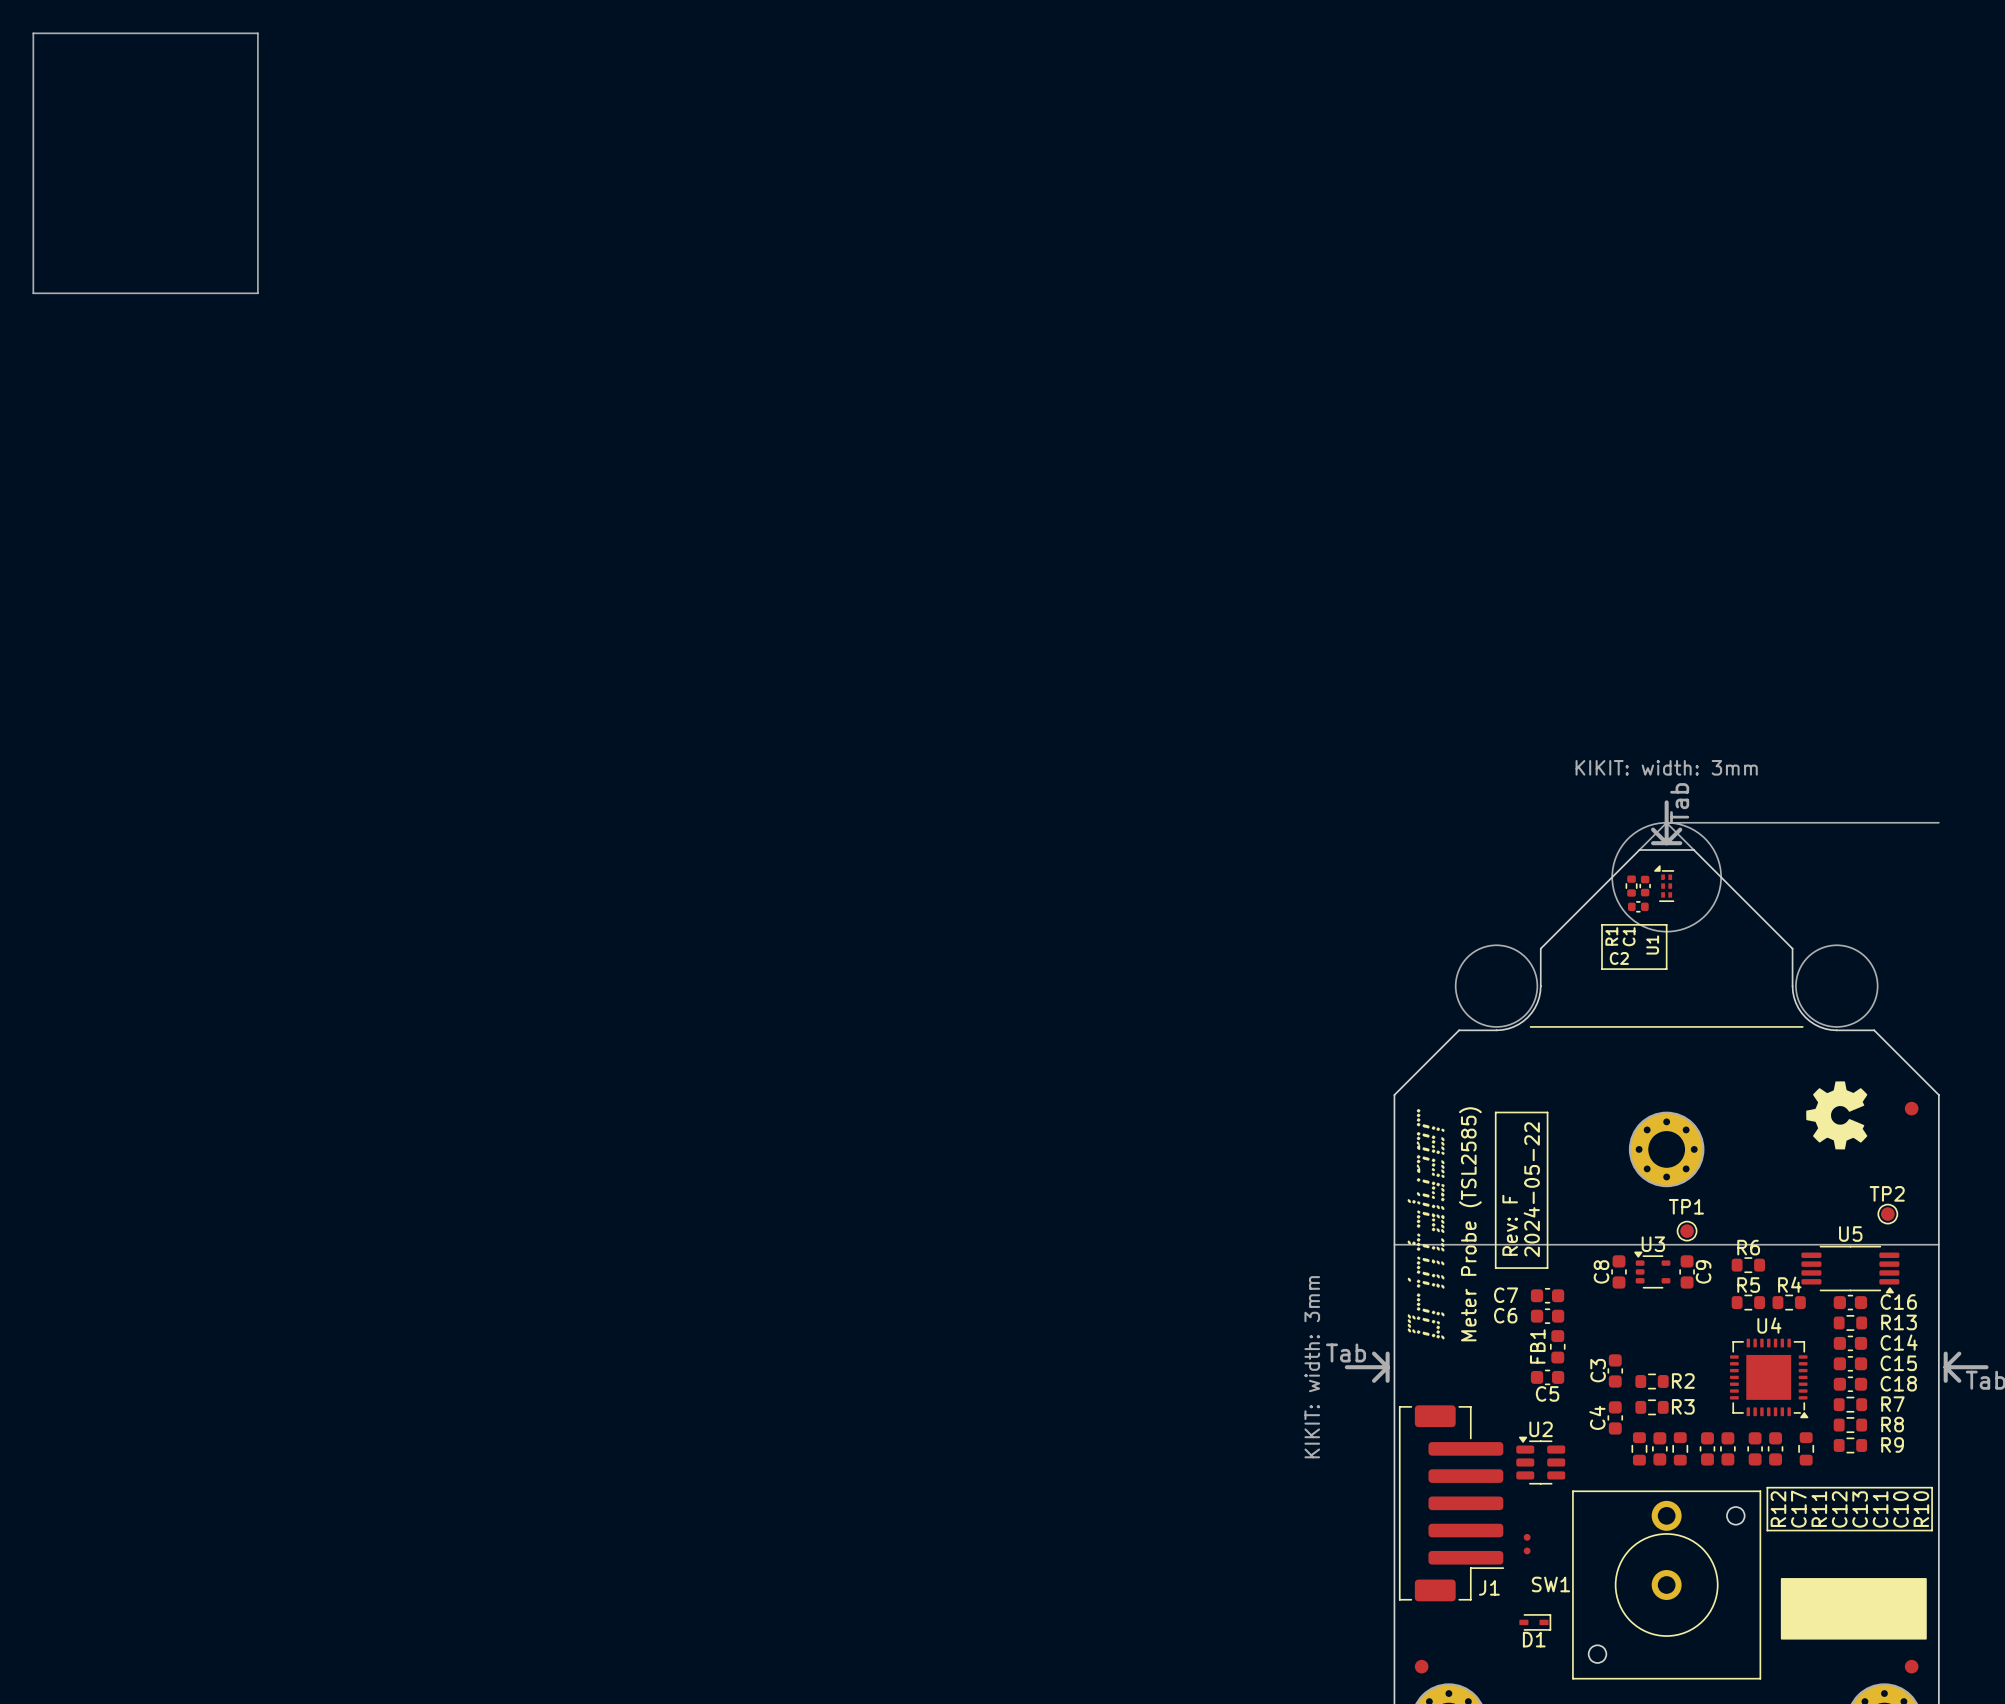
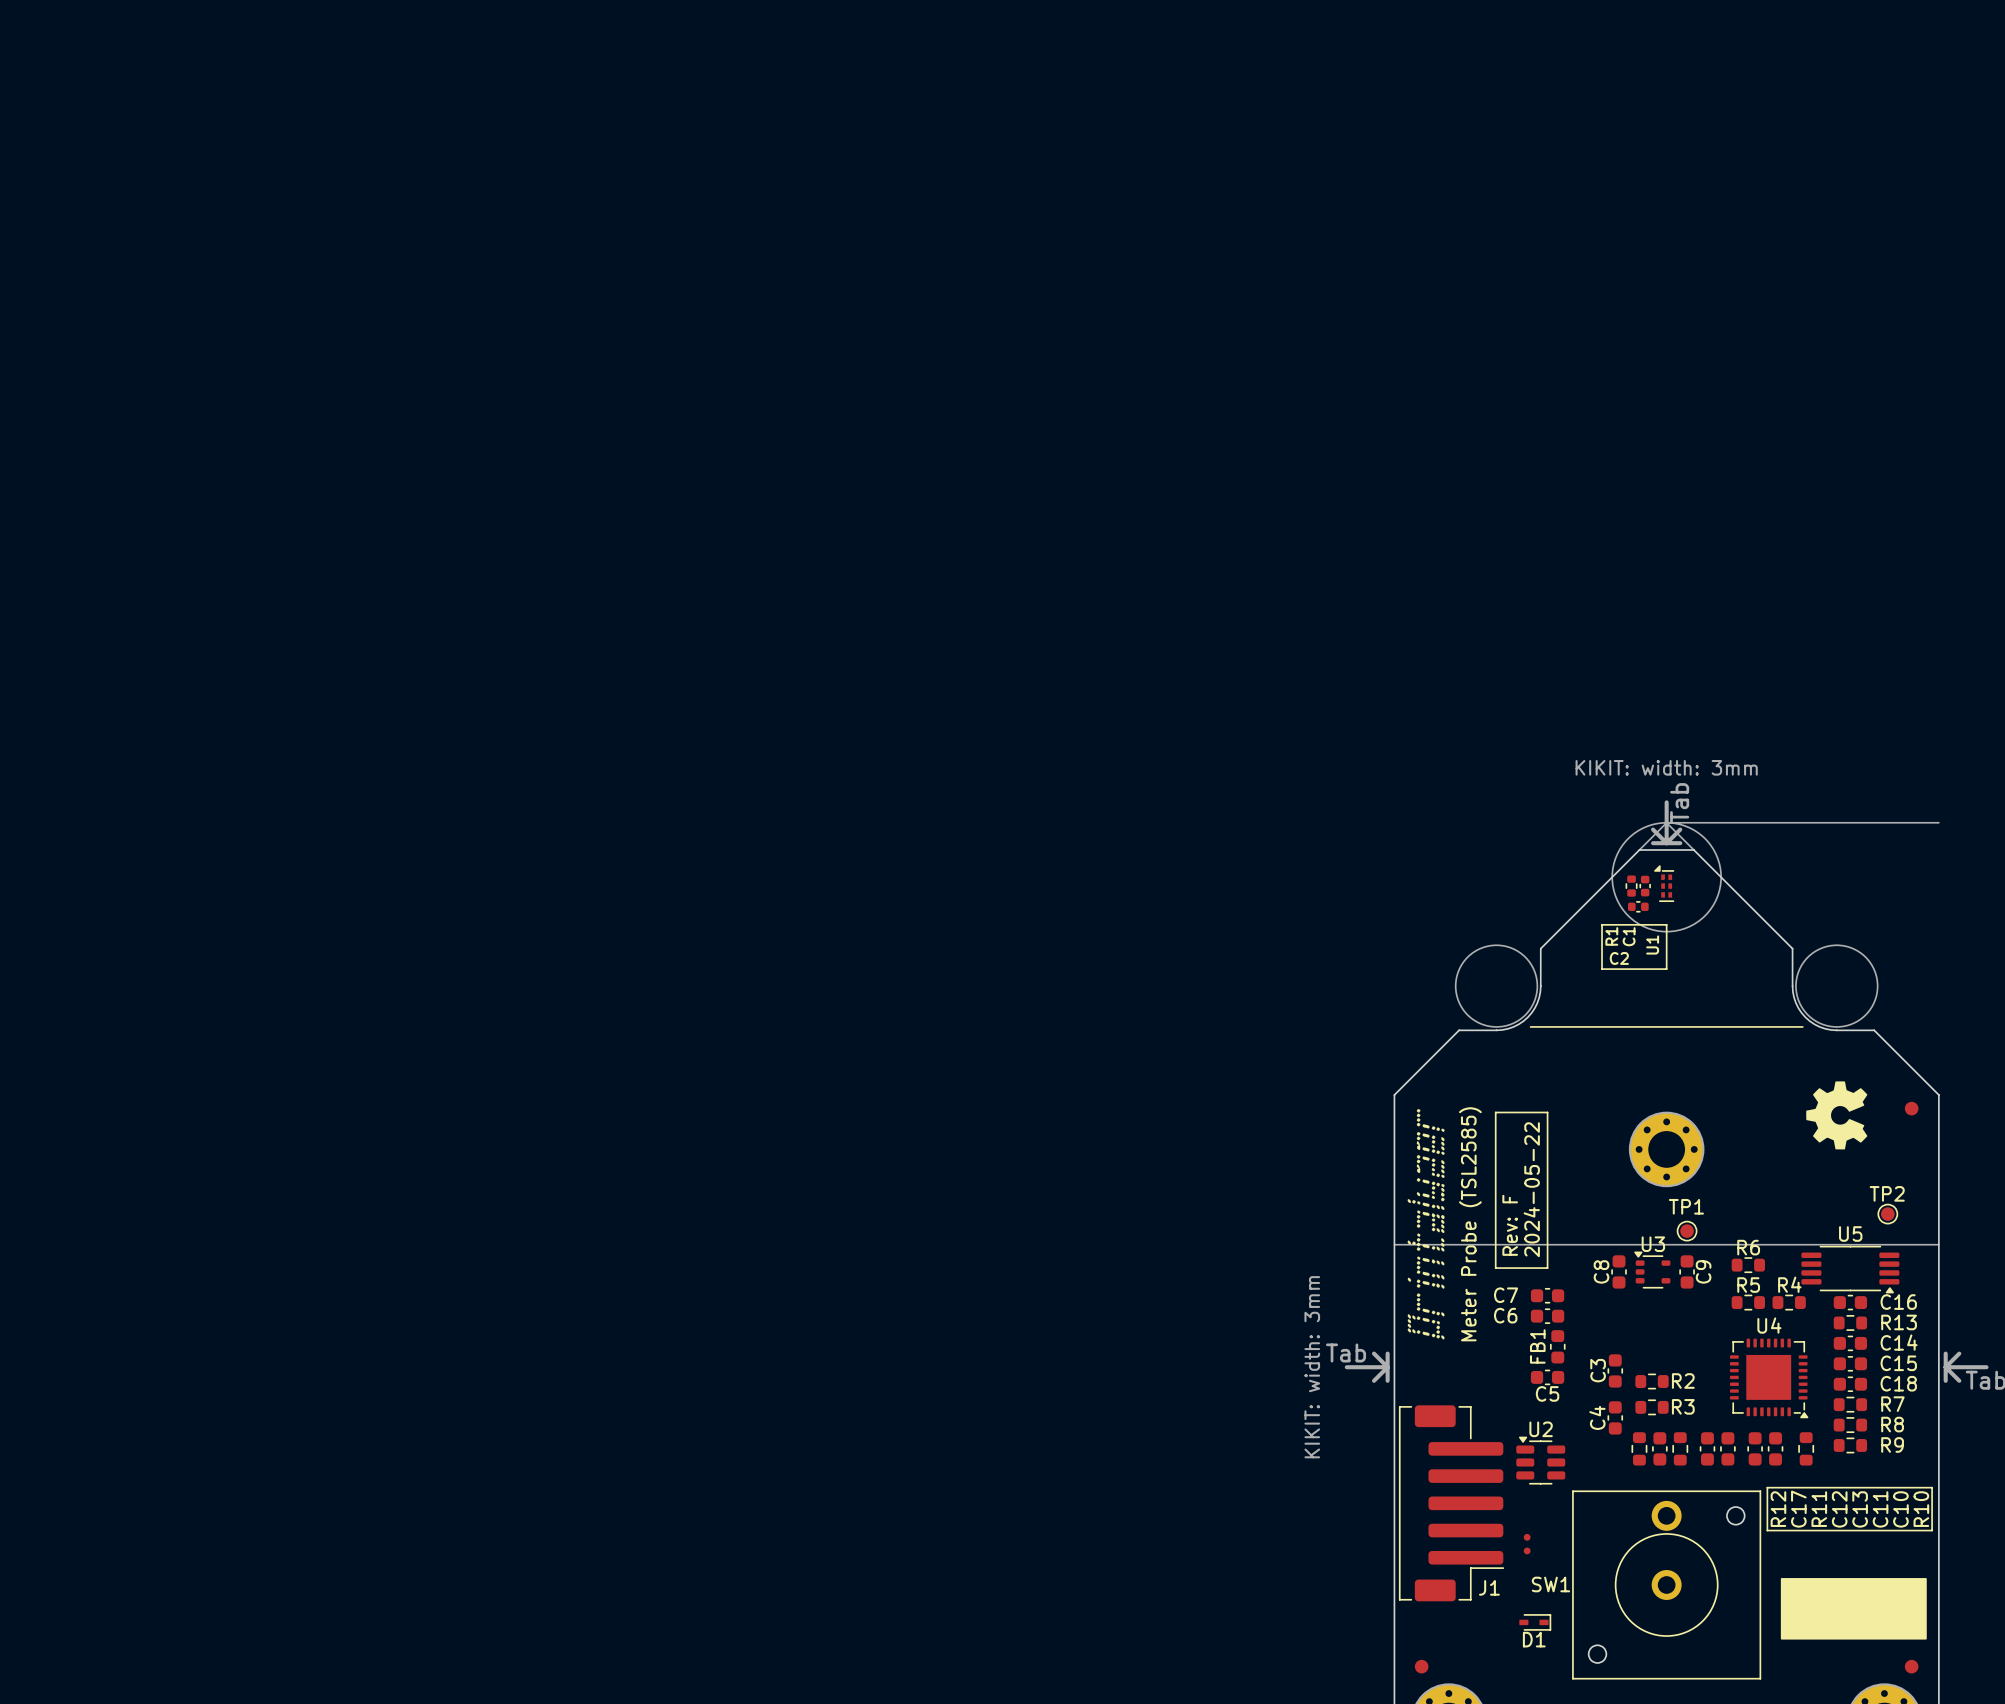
line: (33, 33) (257, 33) (257, 293) (33, 293) (33, 33) -> none

